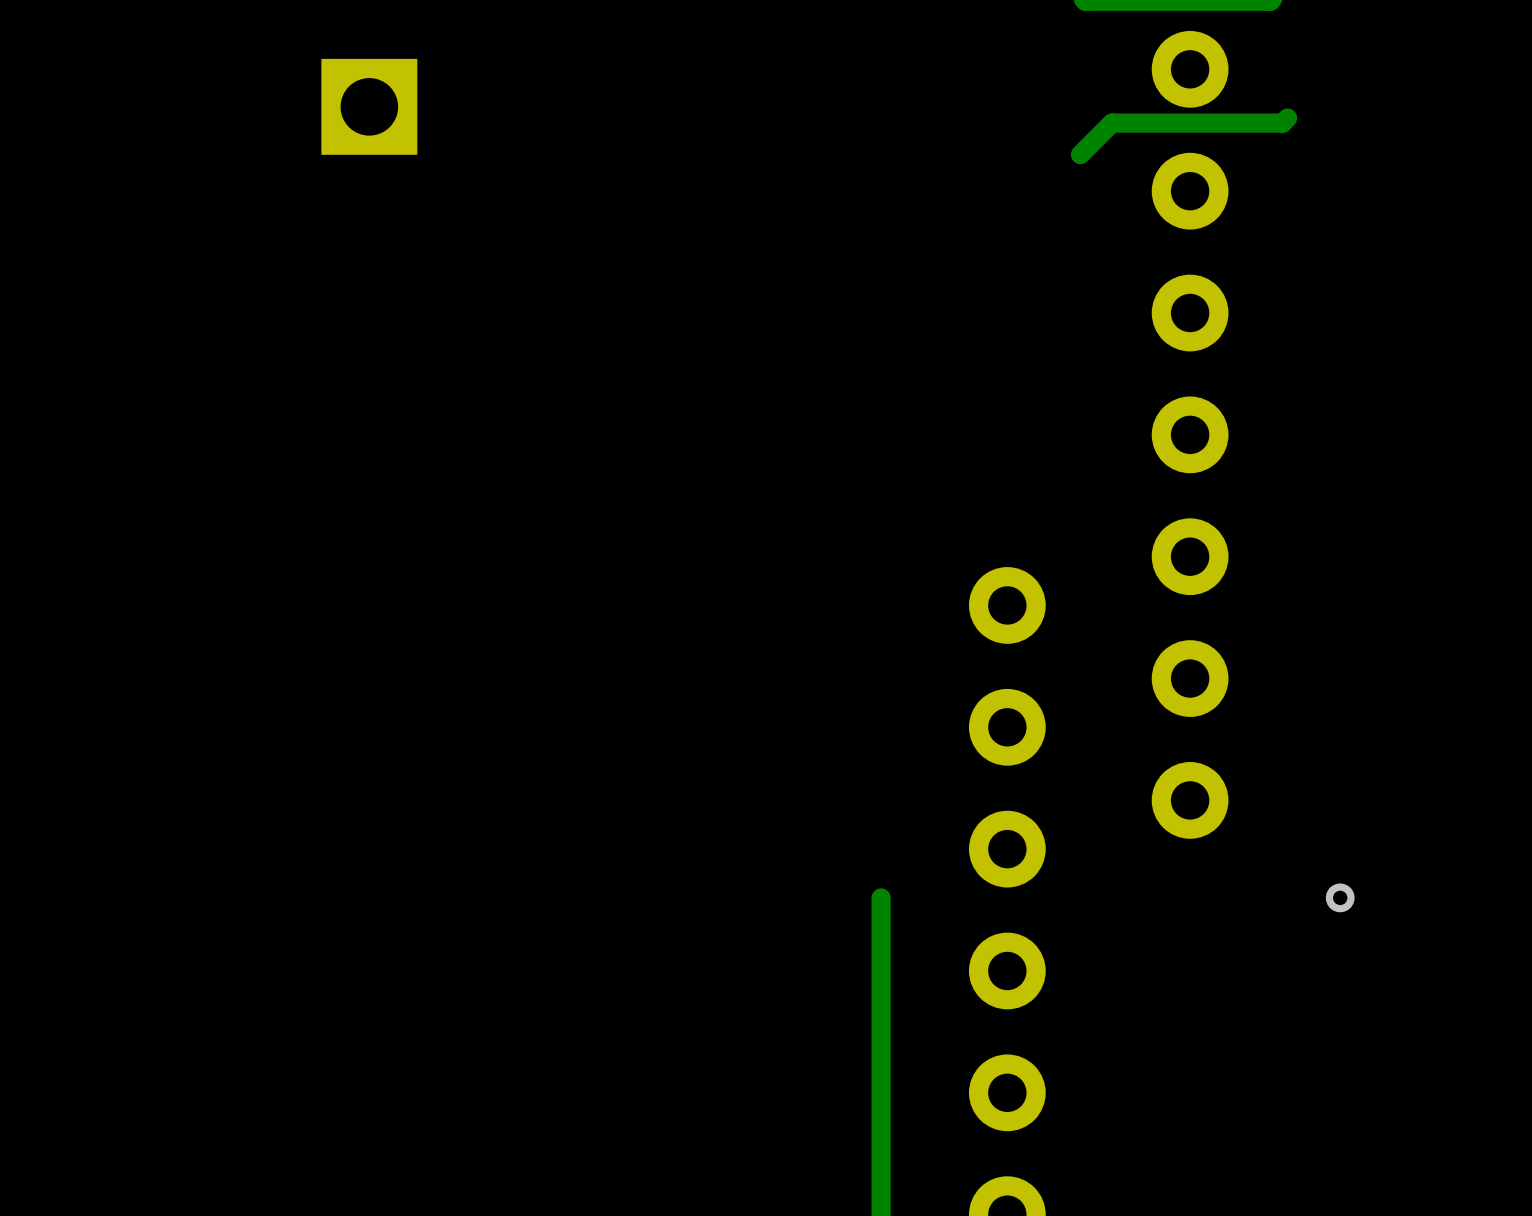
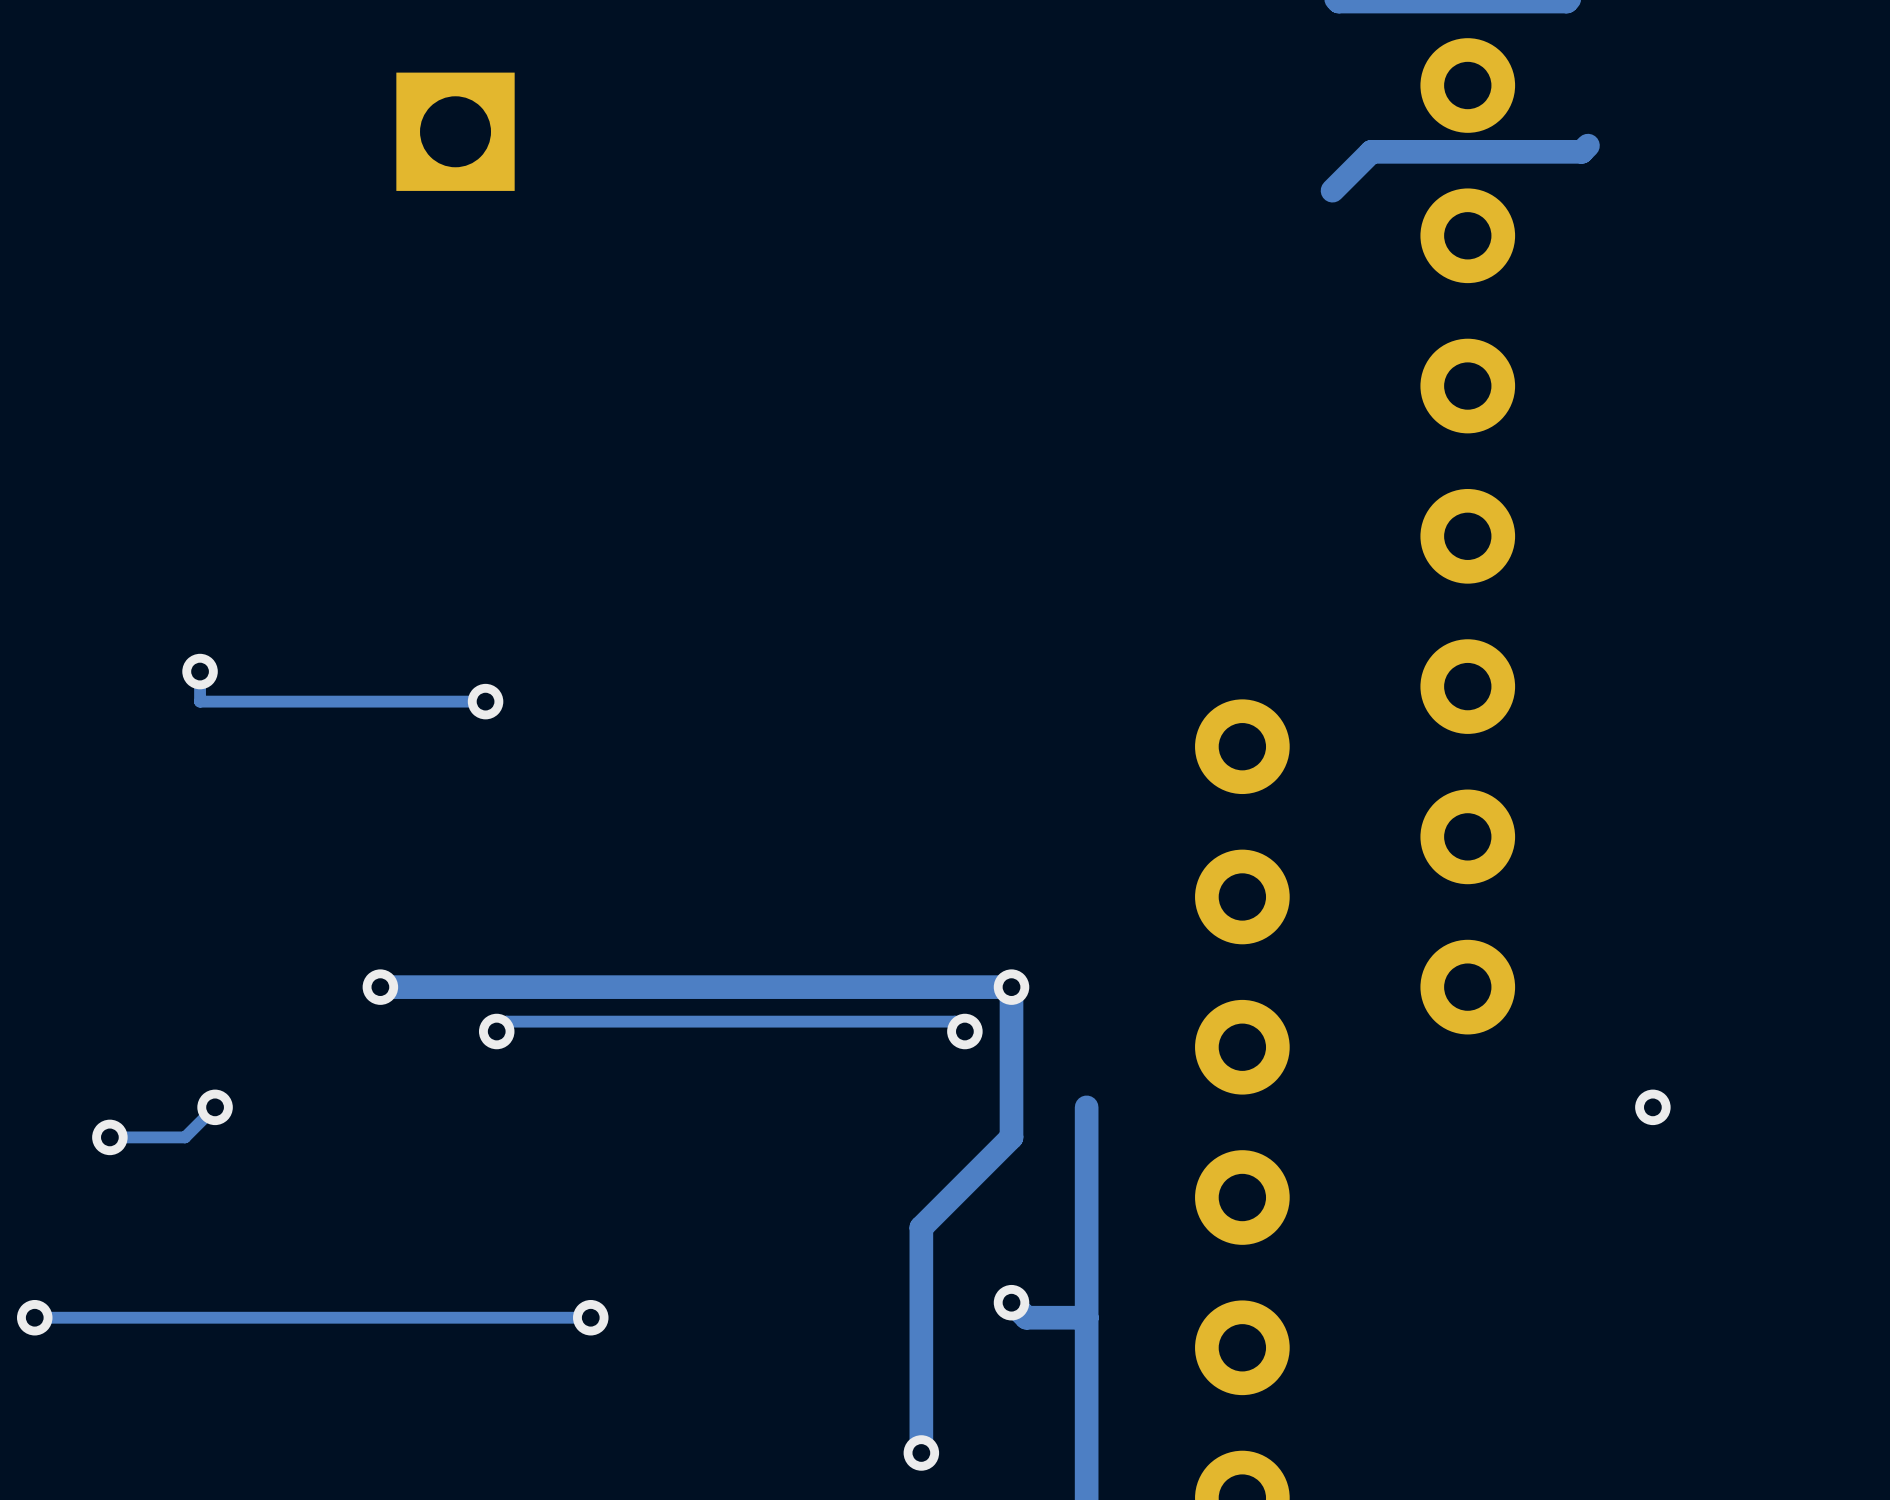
track: none -> (200, 671) (200, 701) (485, 701)
via: none -> (200, 671)
via: none -> (485, 701)
track: none -> (380, 987) (1011, 987) (1011, 1137) (921, 1227) (921, 1452)
via: none -> (380, 987)
via: none -> (1011, 987)
via: none -> (496, 1031)
track: none -> (964, 1031) (955, 1021) (506, 1021) (496, 1031)
via: none -> (964, 1031)
track: none -> (215, 1107) (185, 1137) (109, 1137)
via: none -> (215, 1107)
via: none -> (109, 1137)
track: none -> (1011, 1302) (1026, 1317) (1086, 1317)
via: none -> (1011, 1302)
via: none -> (34, 1317)
track: none -> (590, 1317) (34, 1317)
via: none -> (590, 1317)
via: none -> (921, 1452)

